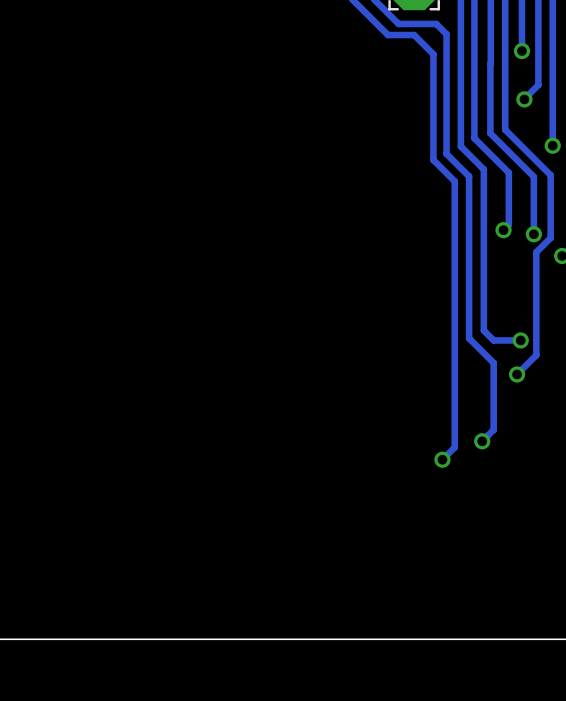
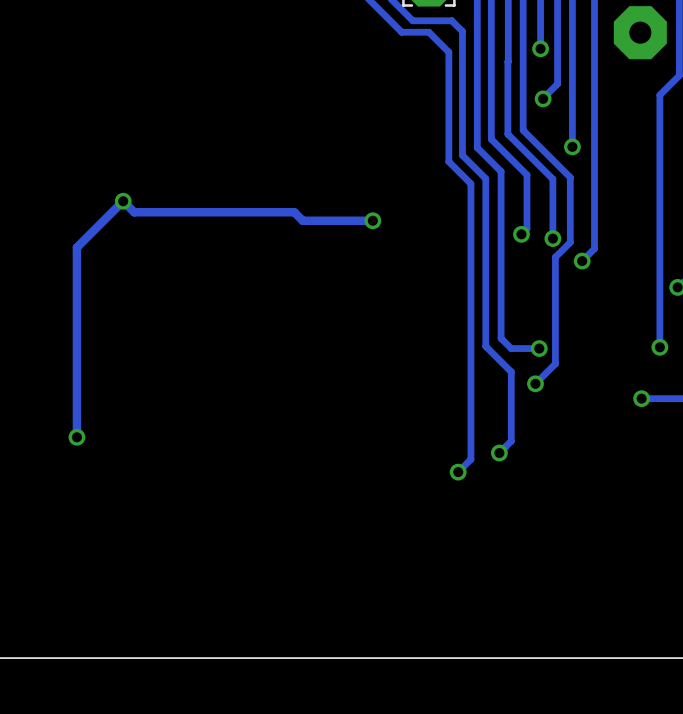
via: none -> (123, 201)
track: none -> (372, 220) (302, 220) (294, 212) (134, 212) (123, 201) (76, 247) (76, 437)
via: none -> (372, 220)
via: none -> (76, 437)

